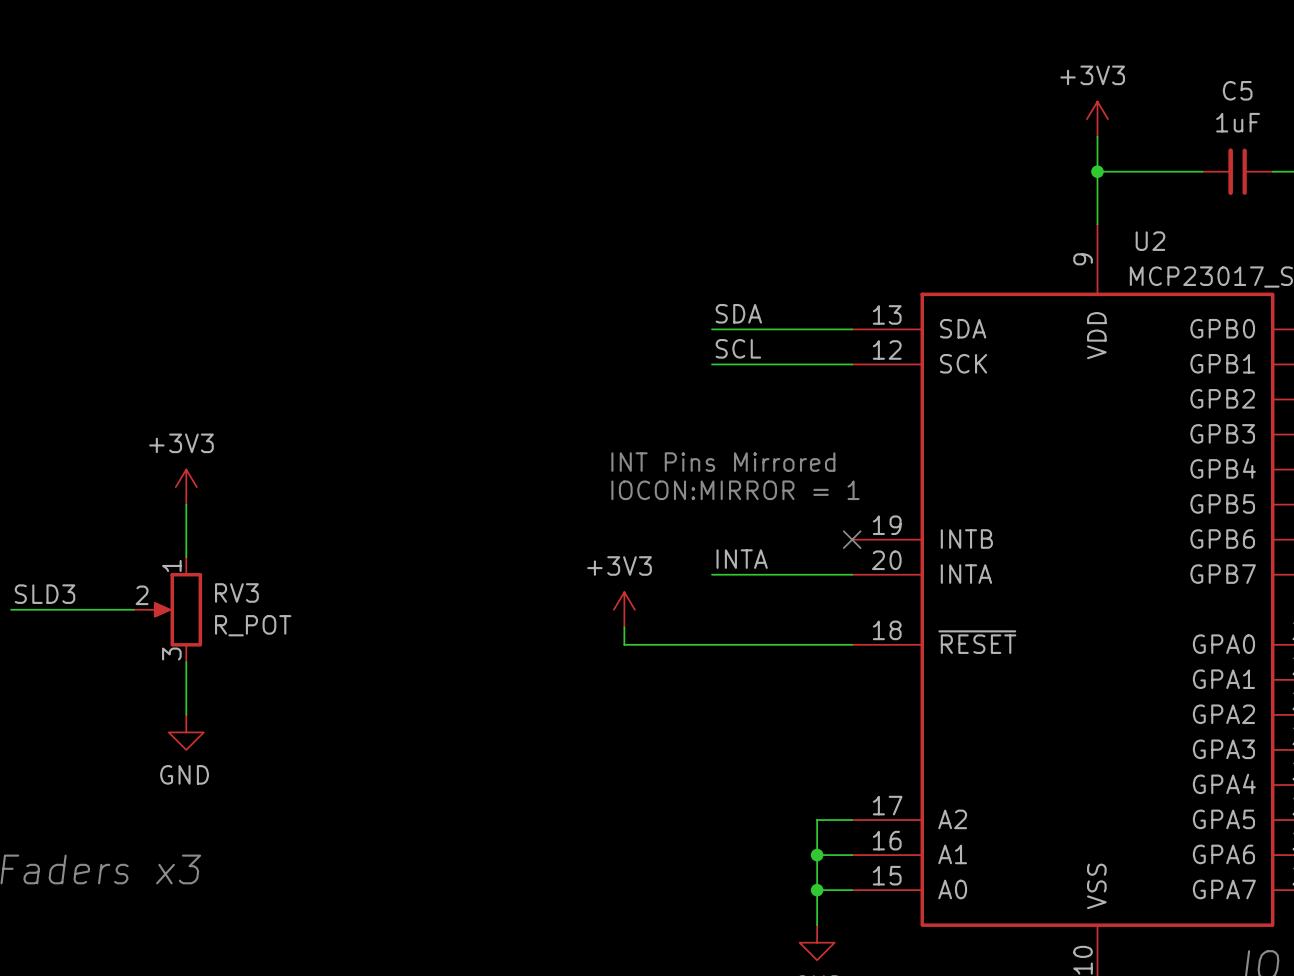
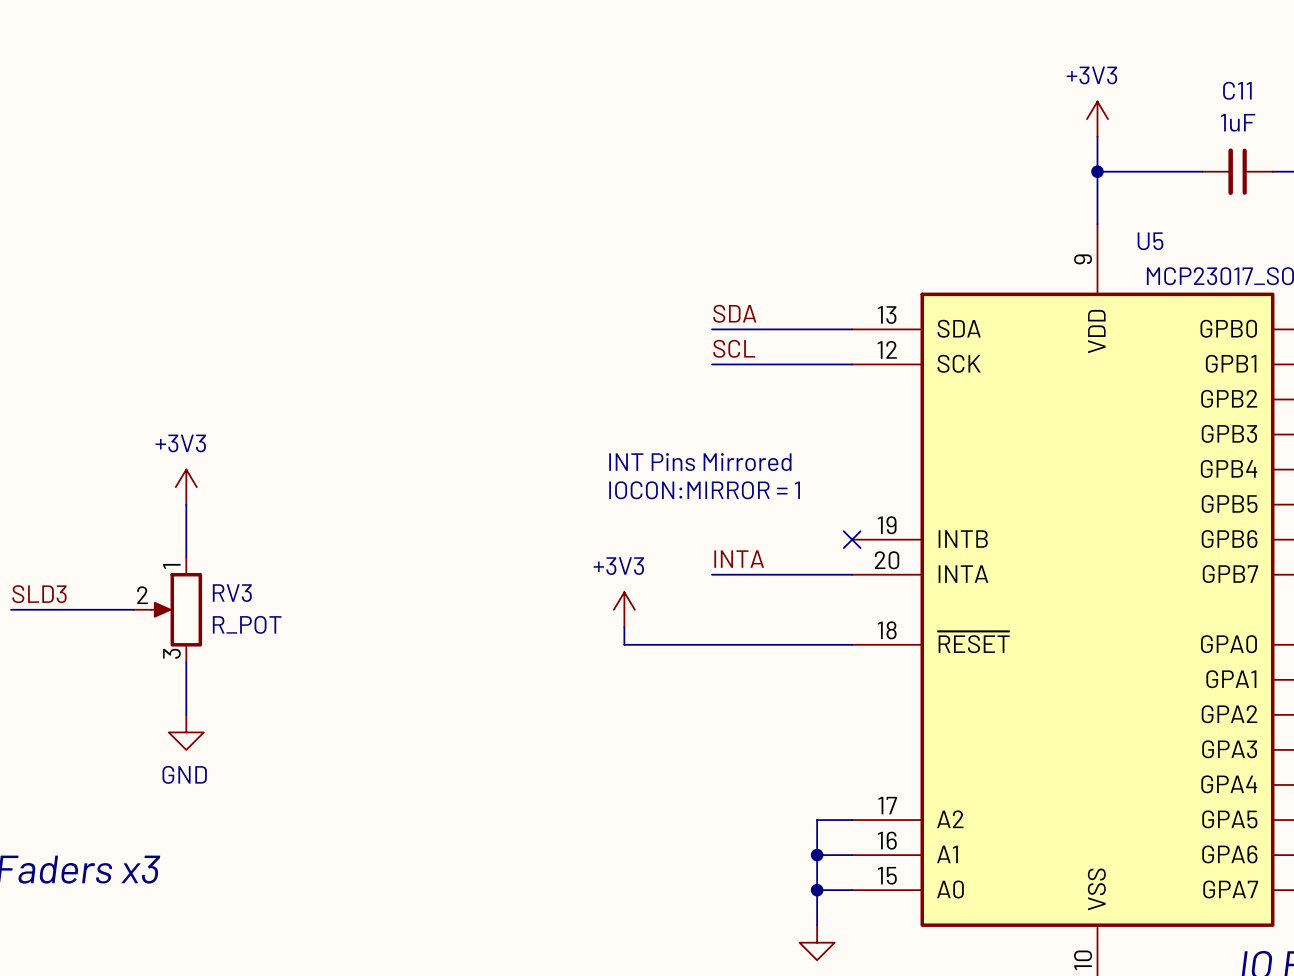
C5 name: C5 (1237, 90) -> C11 (1237, 90)
U2 name: U2 (1150, 241) -> U5 (1150, 241)

